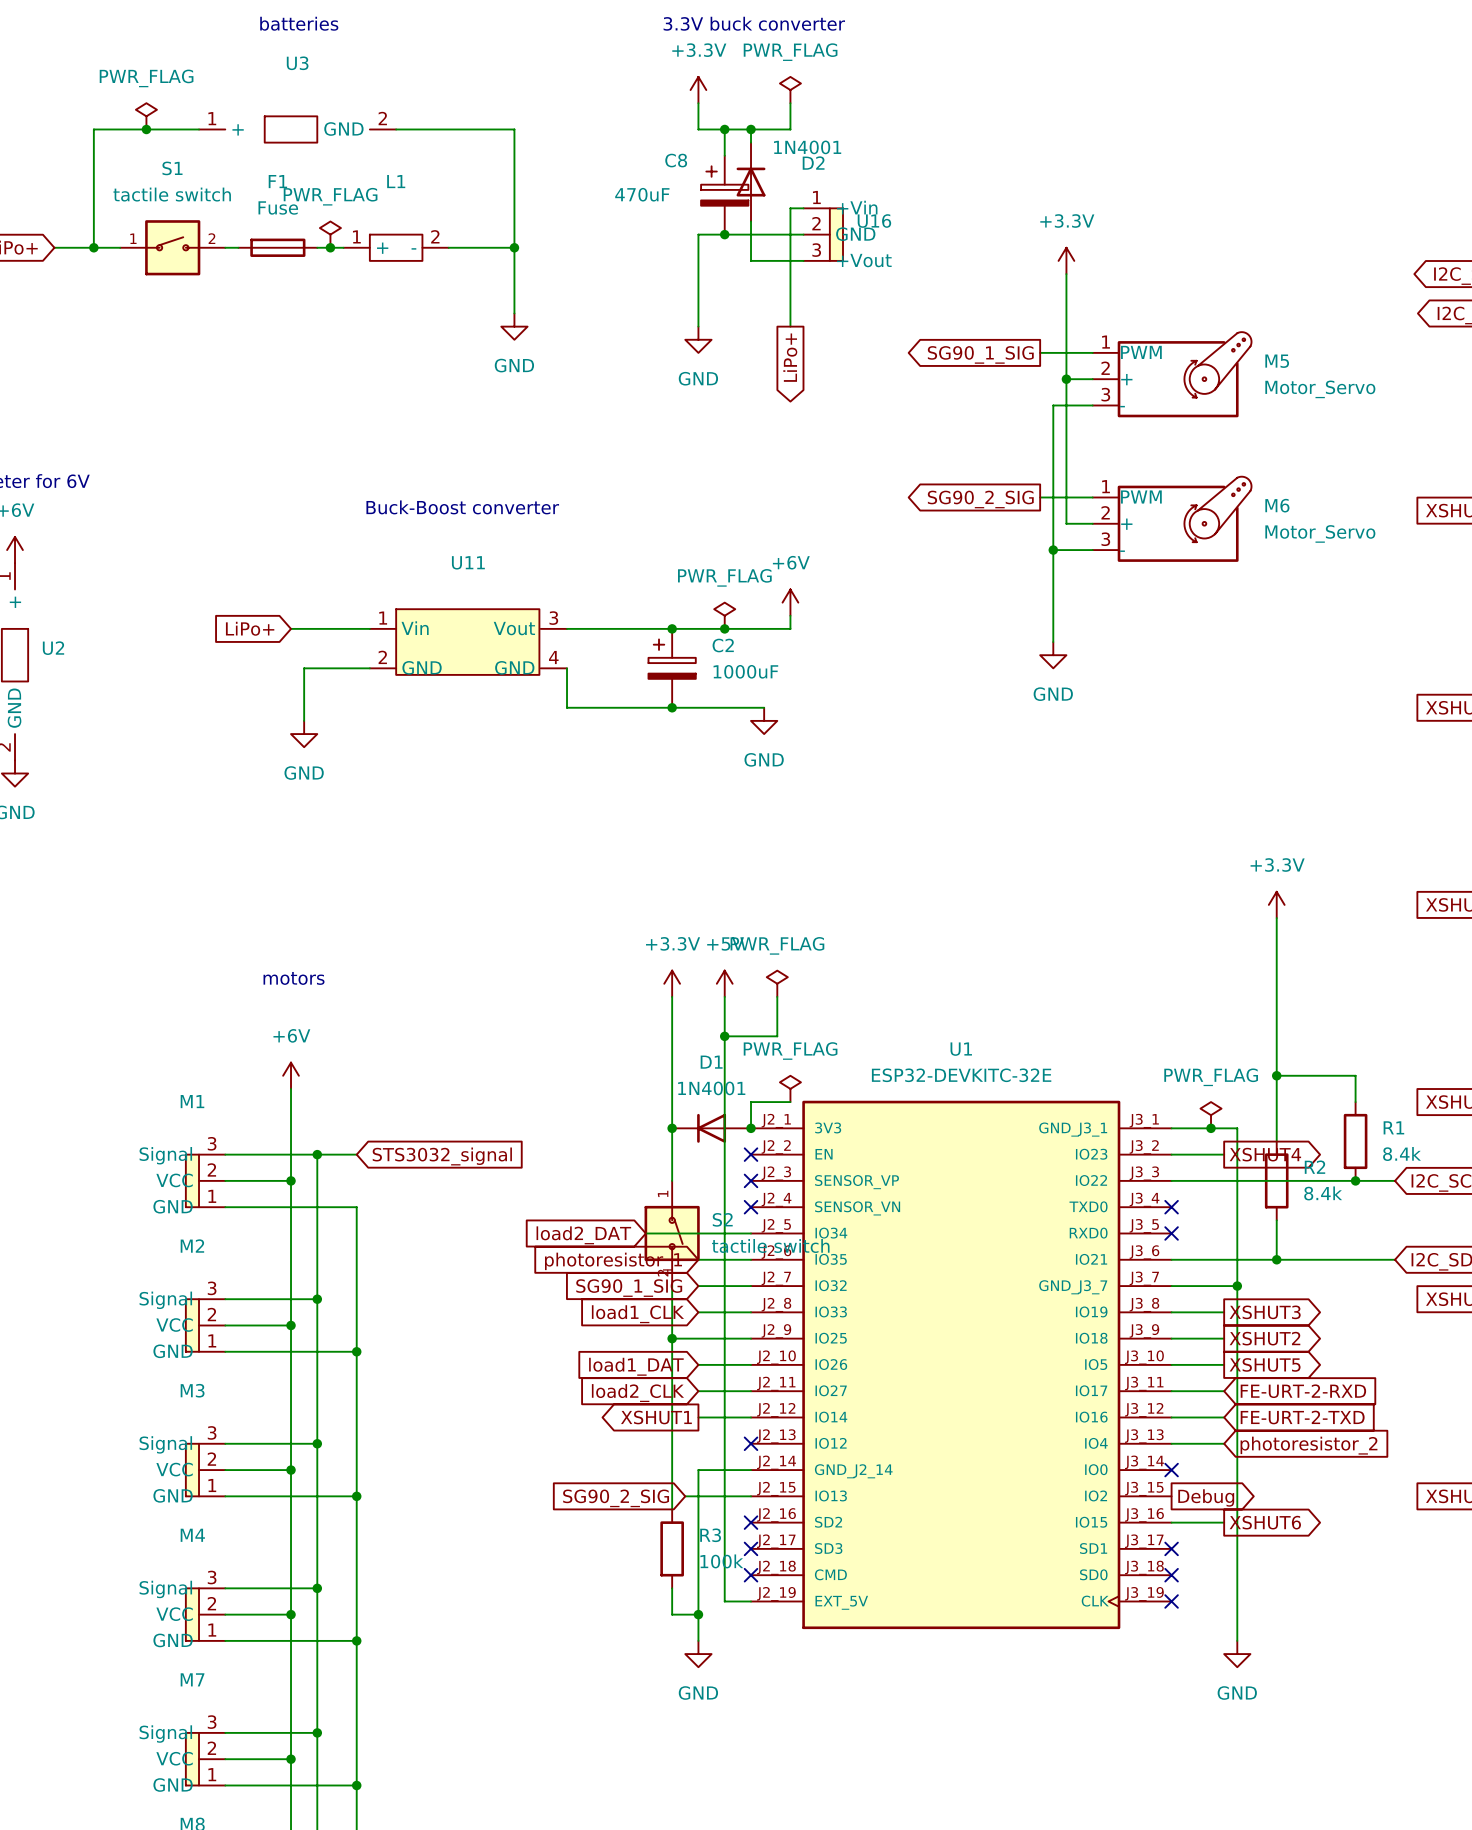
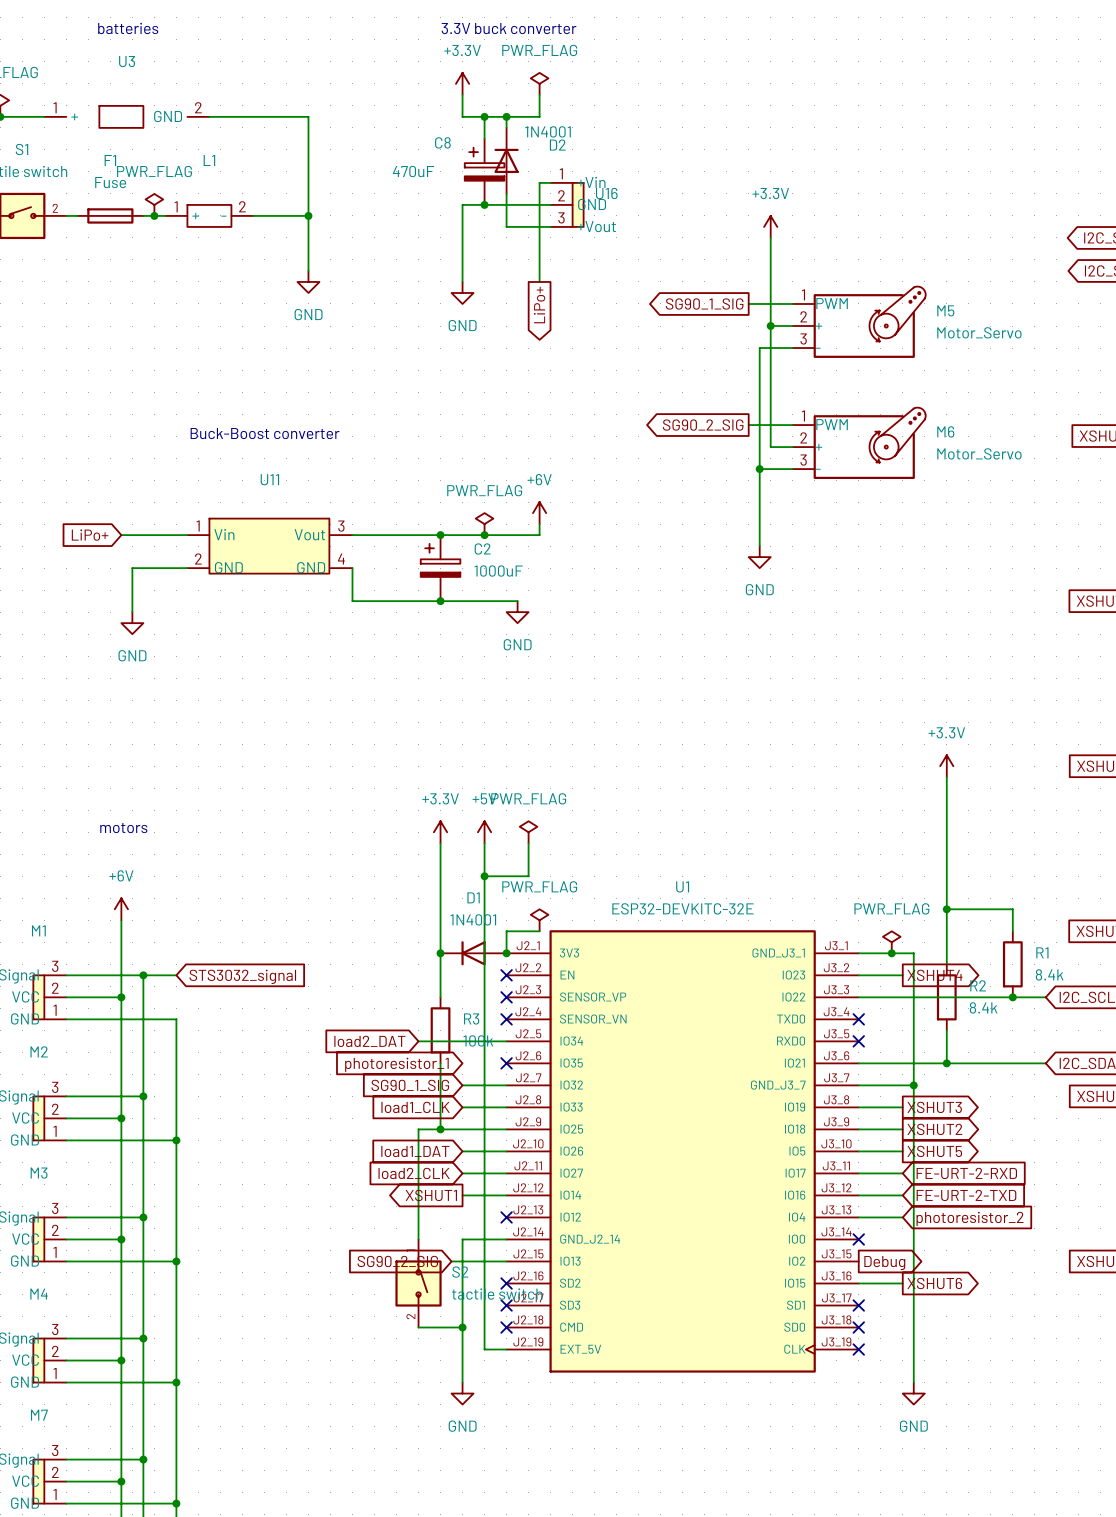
S2 position: (672, 1233) -> (418, 1283)
wire: (698, 1259) (751, 1259) -> none
no-connect mark: none -> (506, 1063)
wire: (672, 1338) (672, 1509) -> (440, 1129) (418, 1129) (418, 1239)
R3 position: (672, 1548) -> (440, 1030)
wire: none -> (418, 1327) (462, 1327)
wire: (672, 1588) (672, 1614) (698, 1614) -> none
junction position: (698, 1614) -> (462, 1327)

